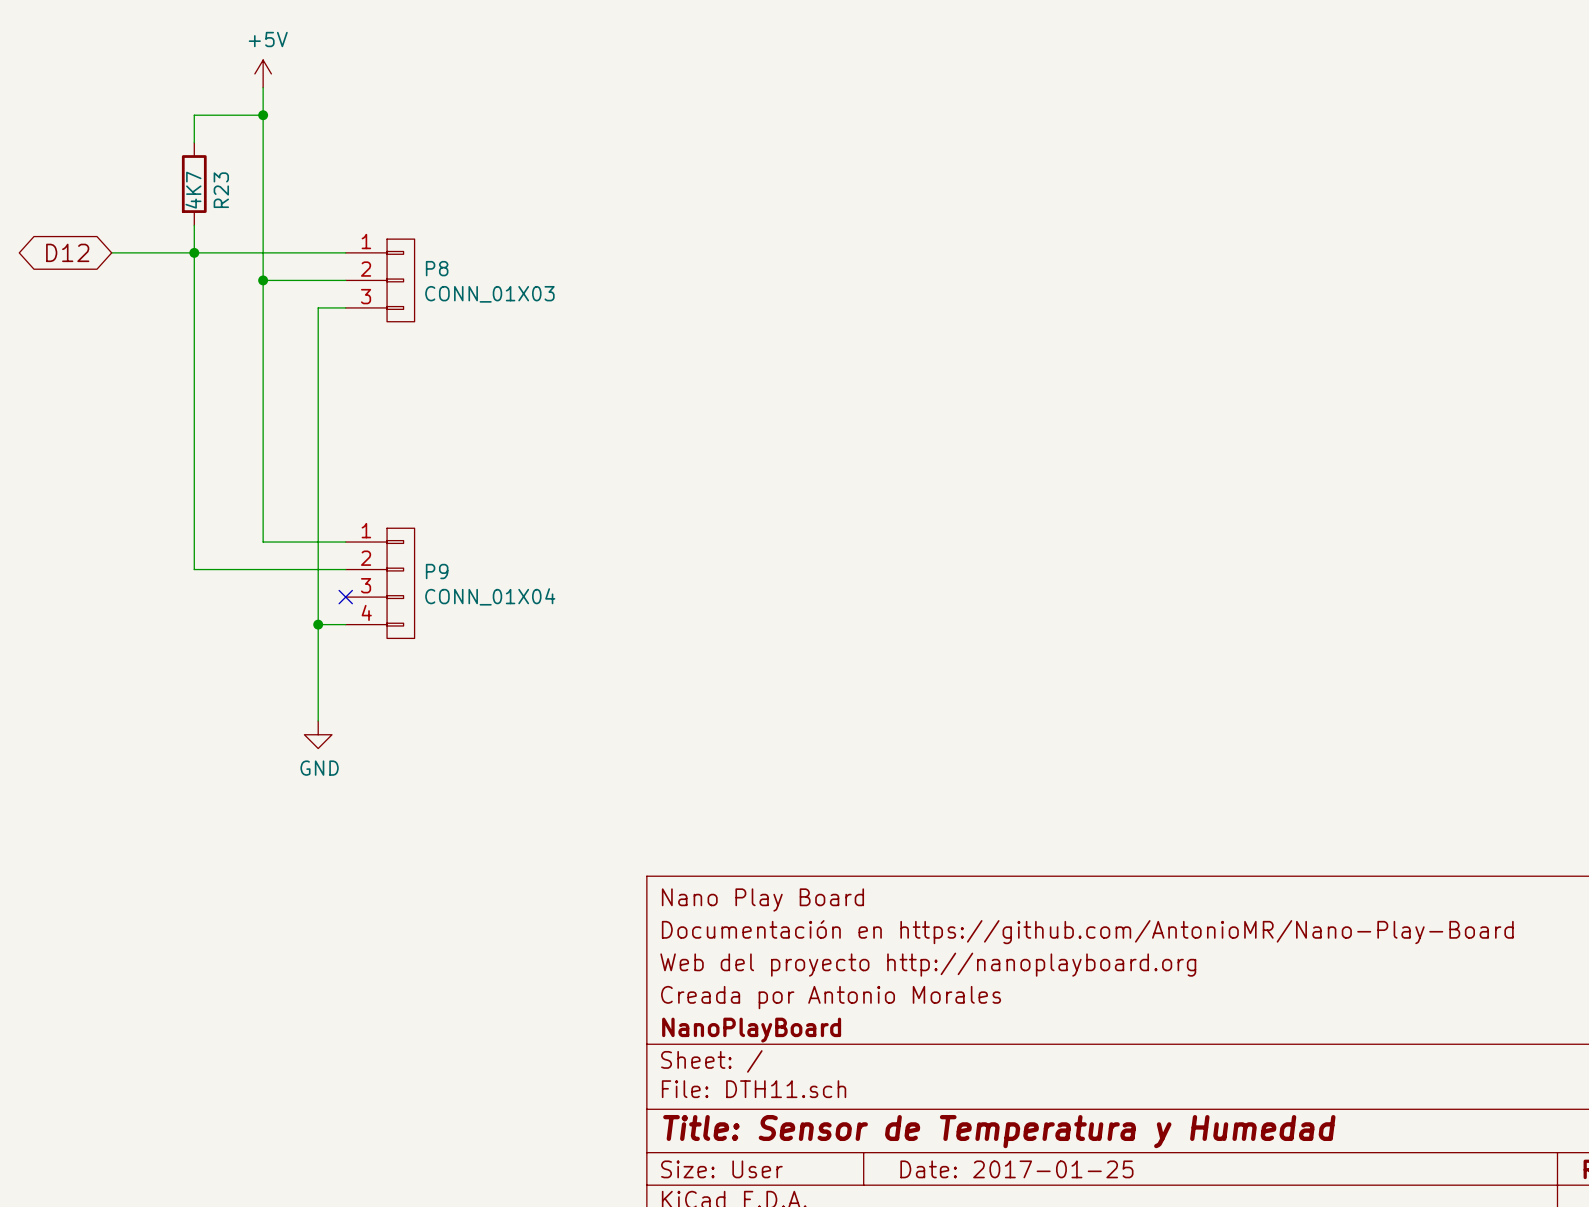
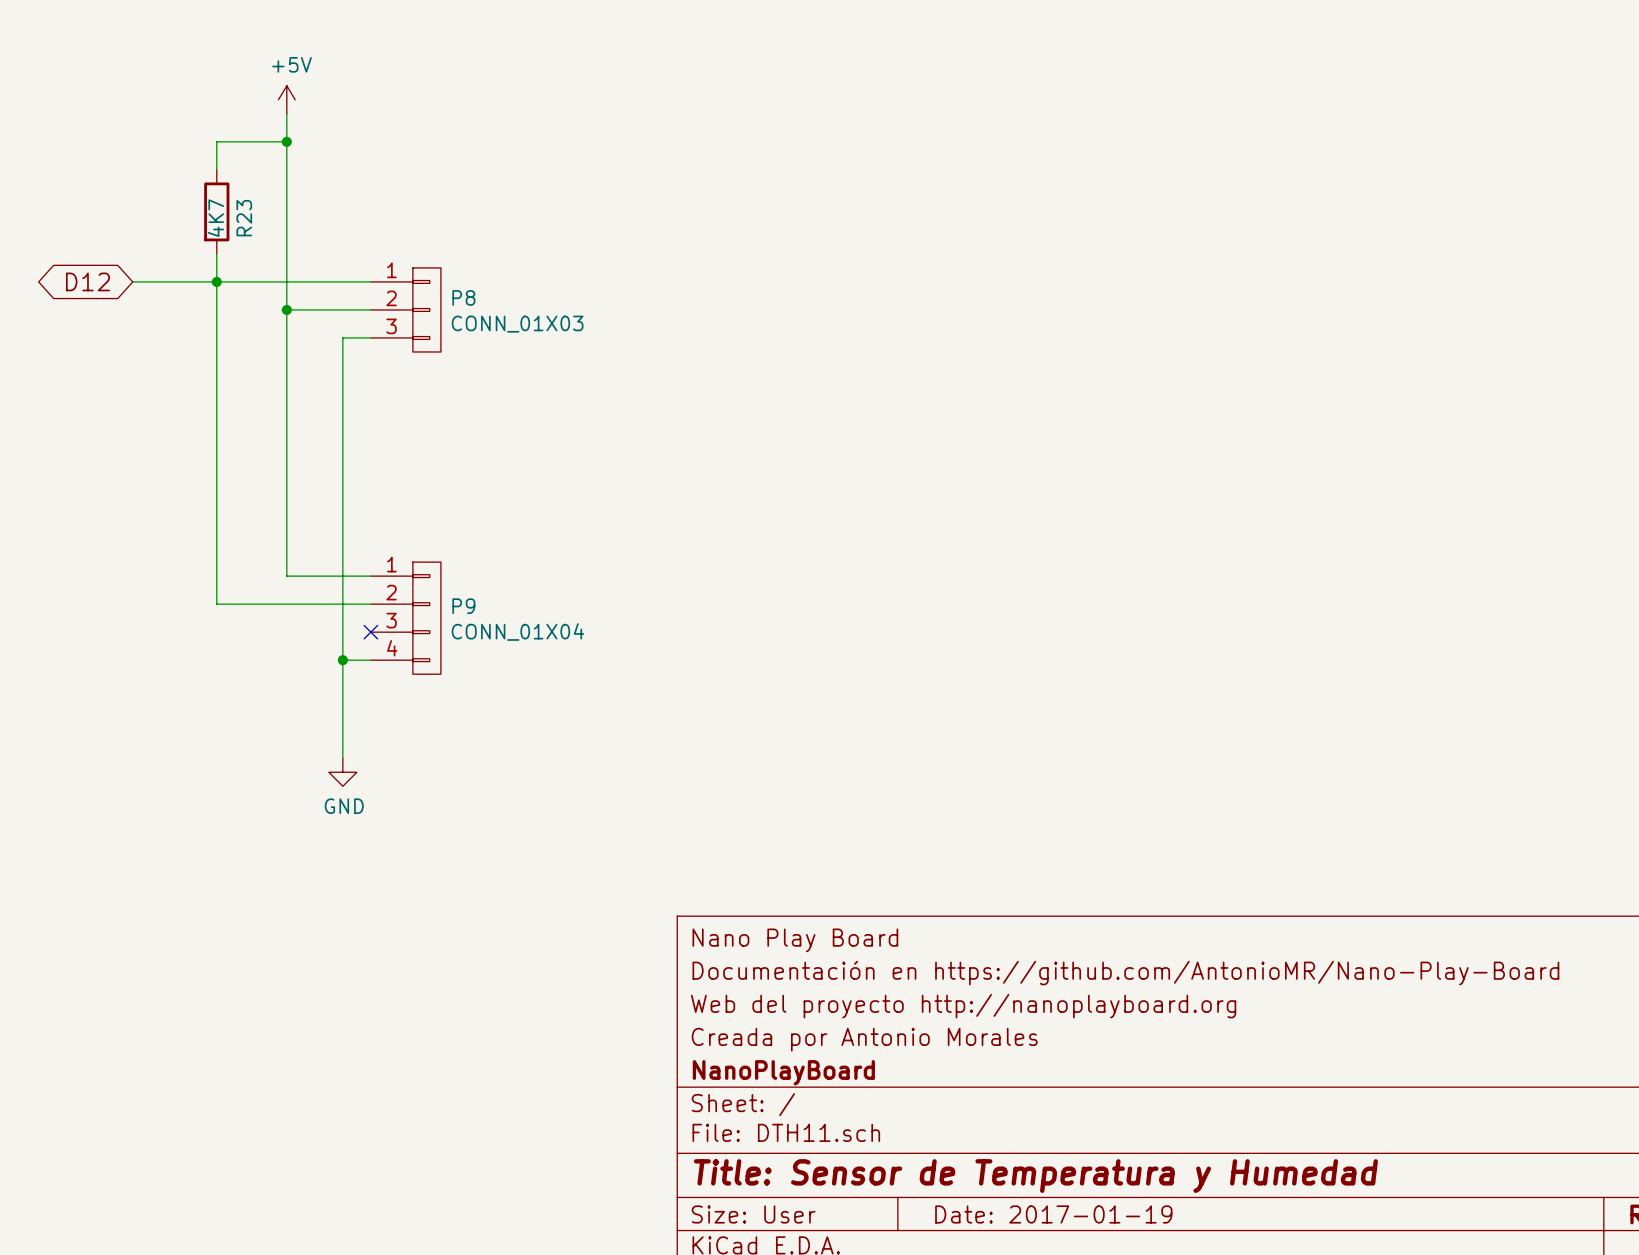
title block: Date: 2017-01-25 (1016, 1169) -> Date: 2017-01-19 (1053, 1214)

